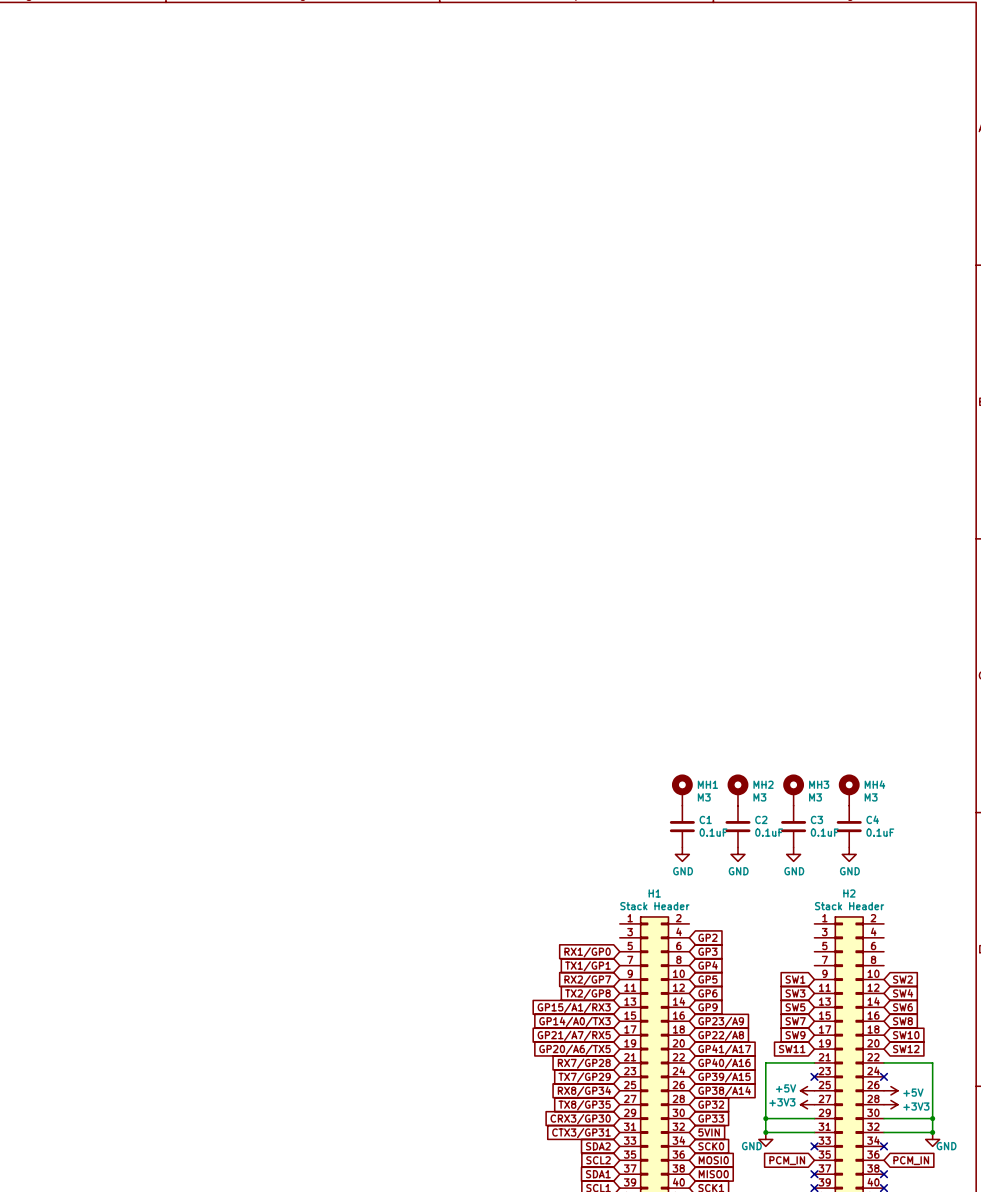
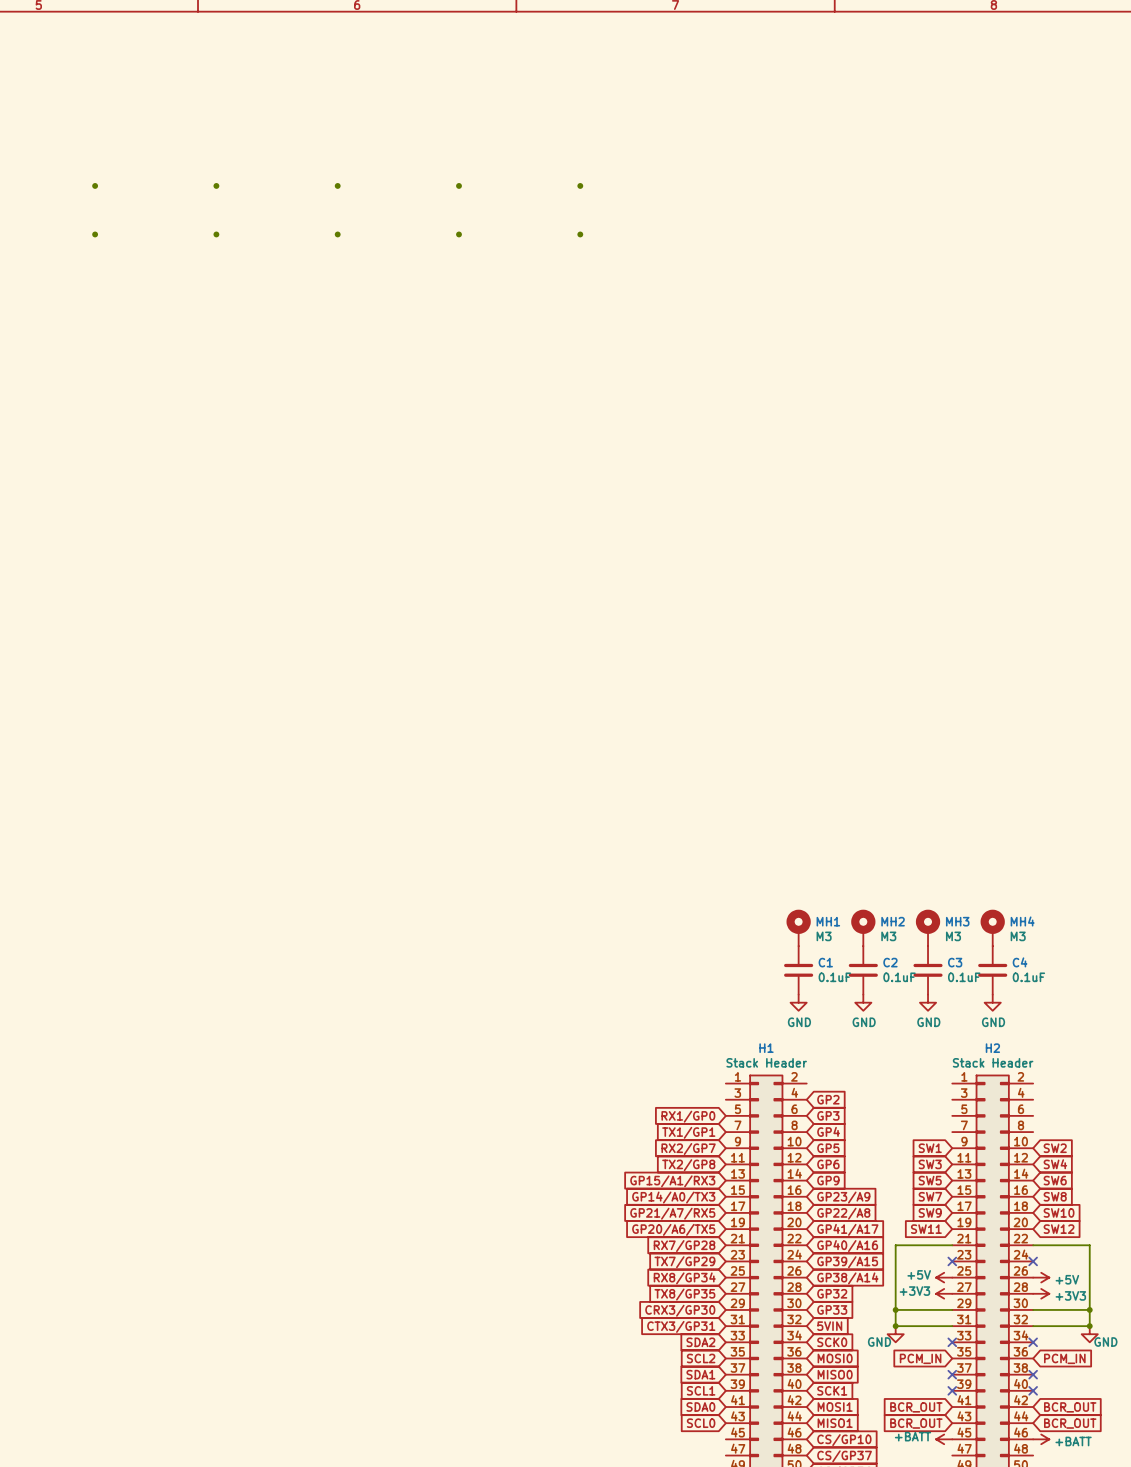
junction: none -> (95, 185)
junction: none -> (216, 185)
junction: none -> (337, 185)
junction: none -> (459, 185)
junction: none -> (580, 185)
junction: none -> (95, 234)
junction: none -> (216, 234)
junction: none -> (337, 234)
junction: none -> (459, 234)
junction: none -> (580, 234)

